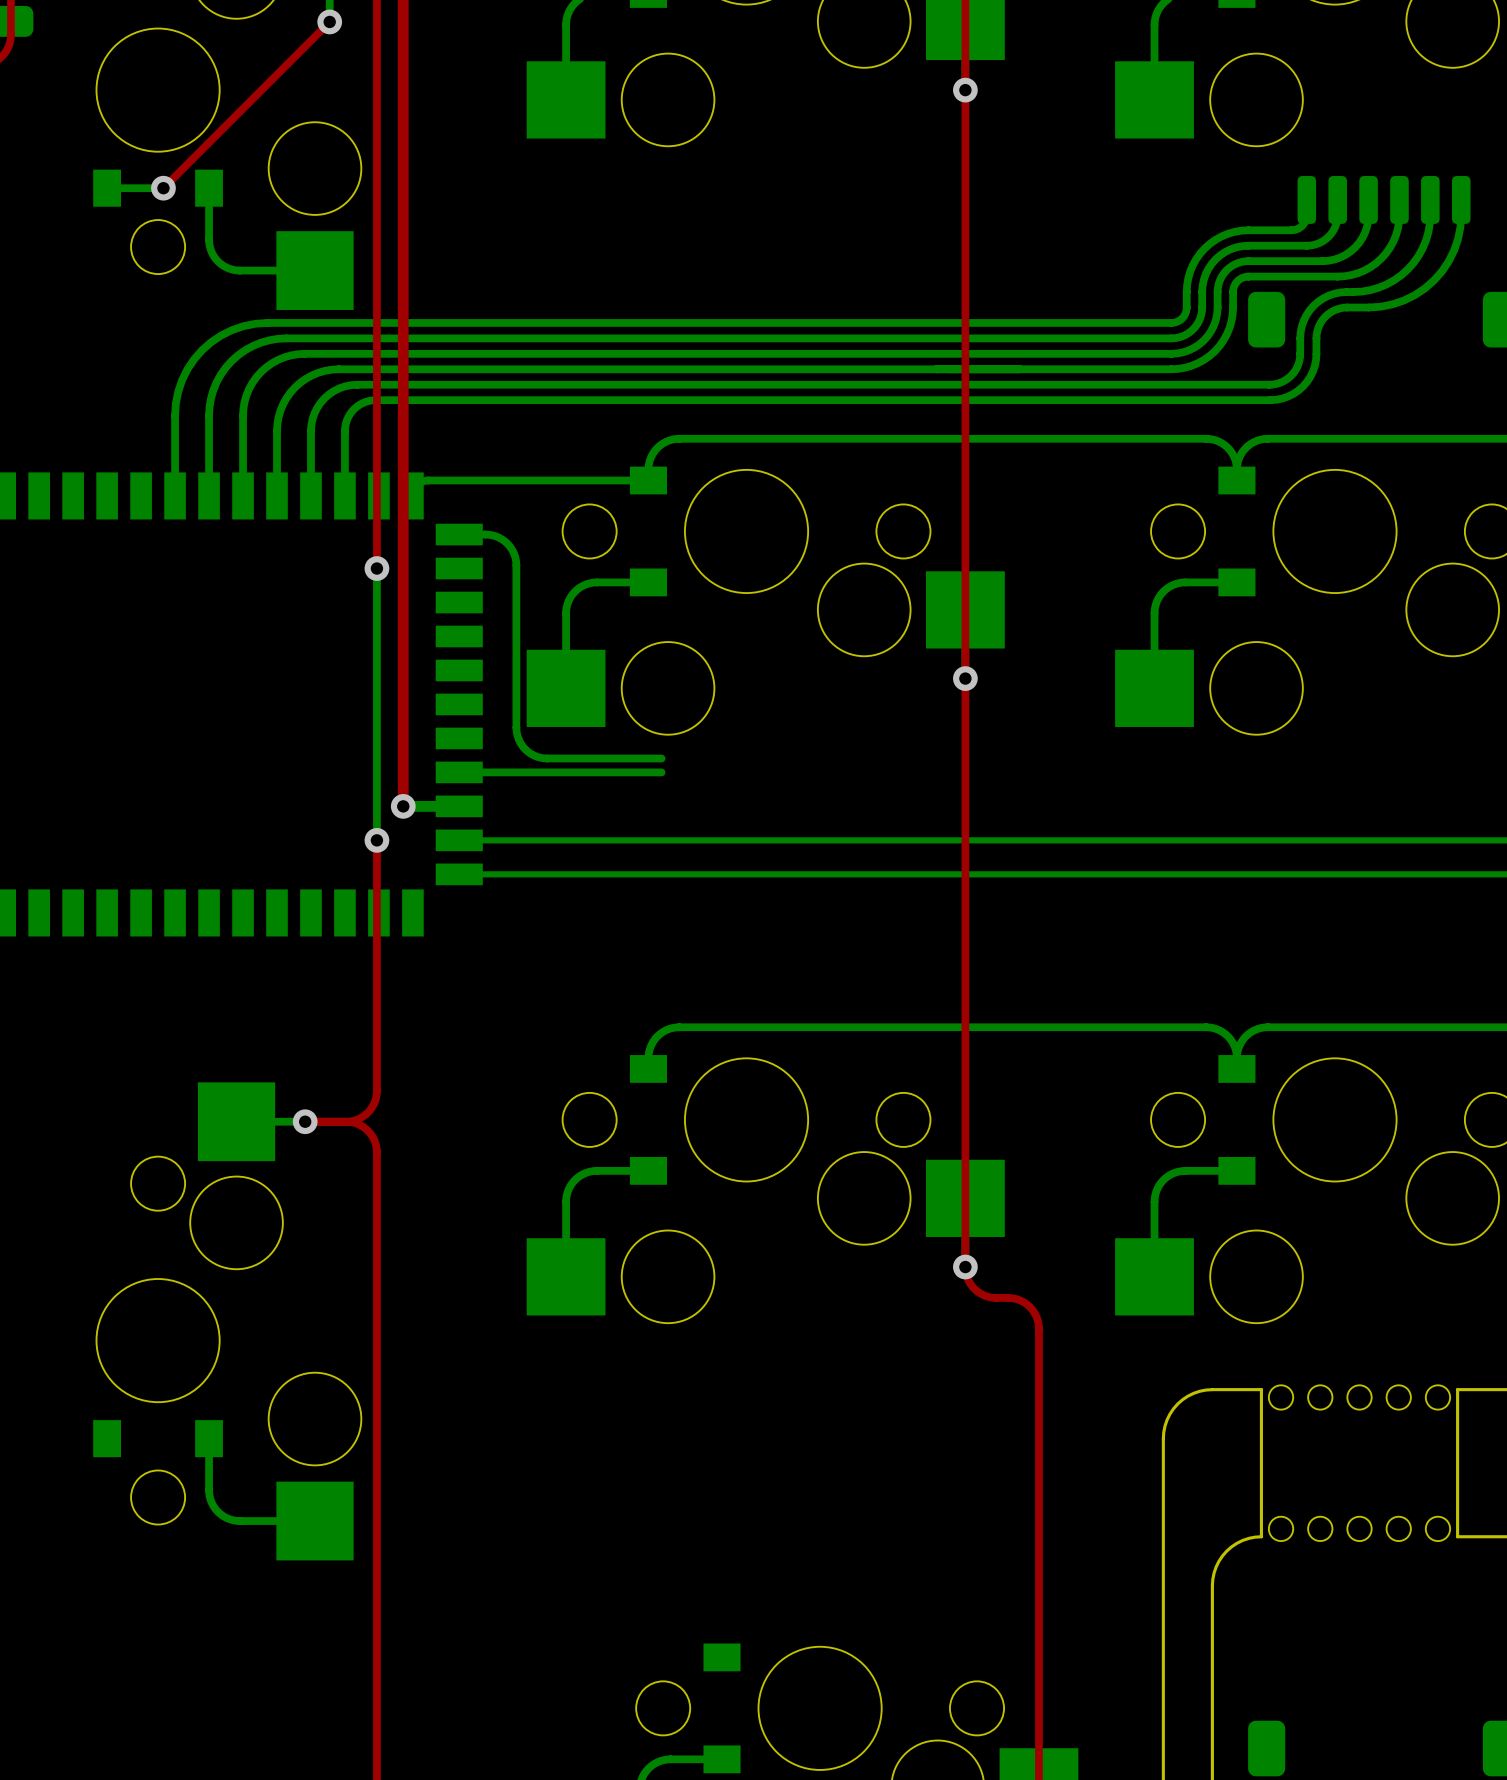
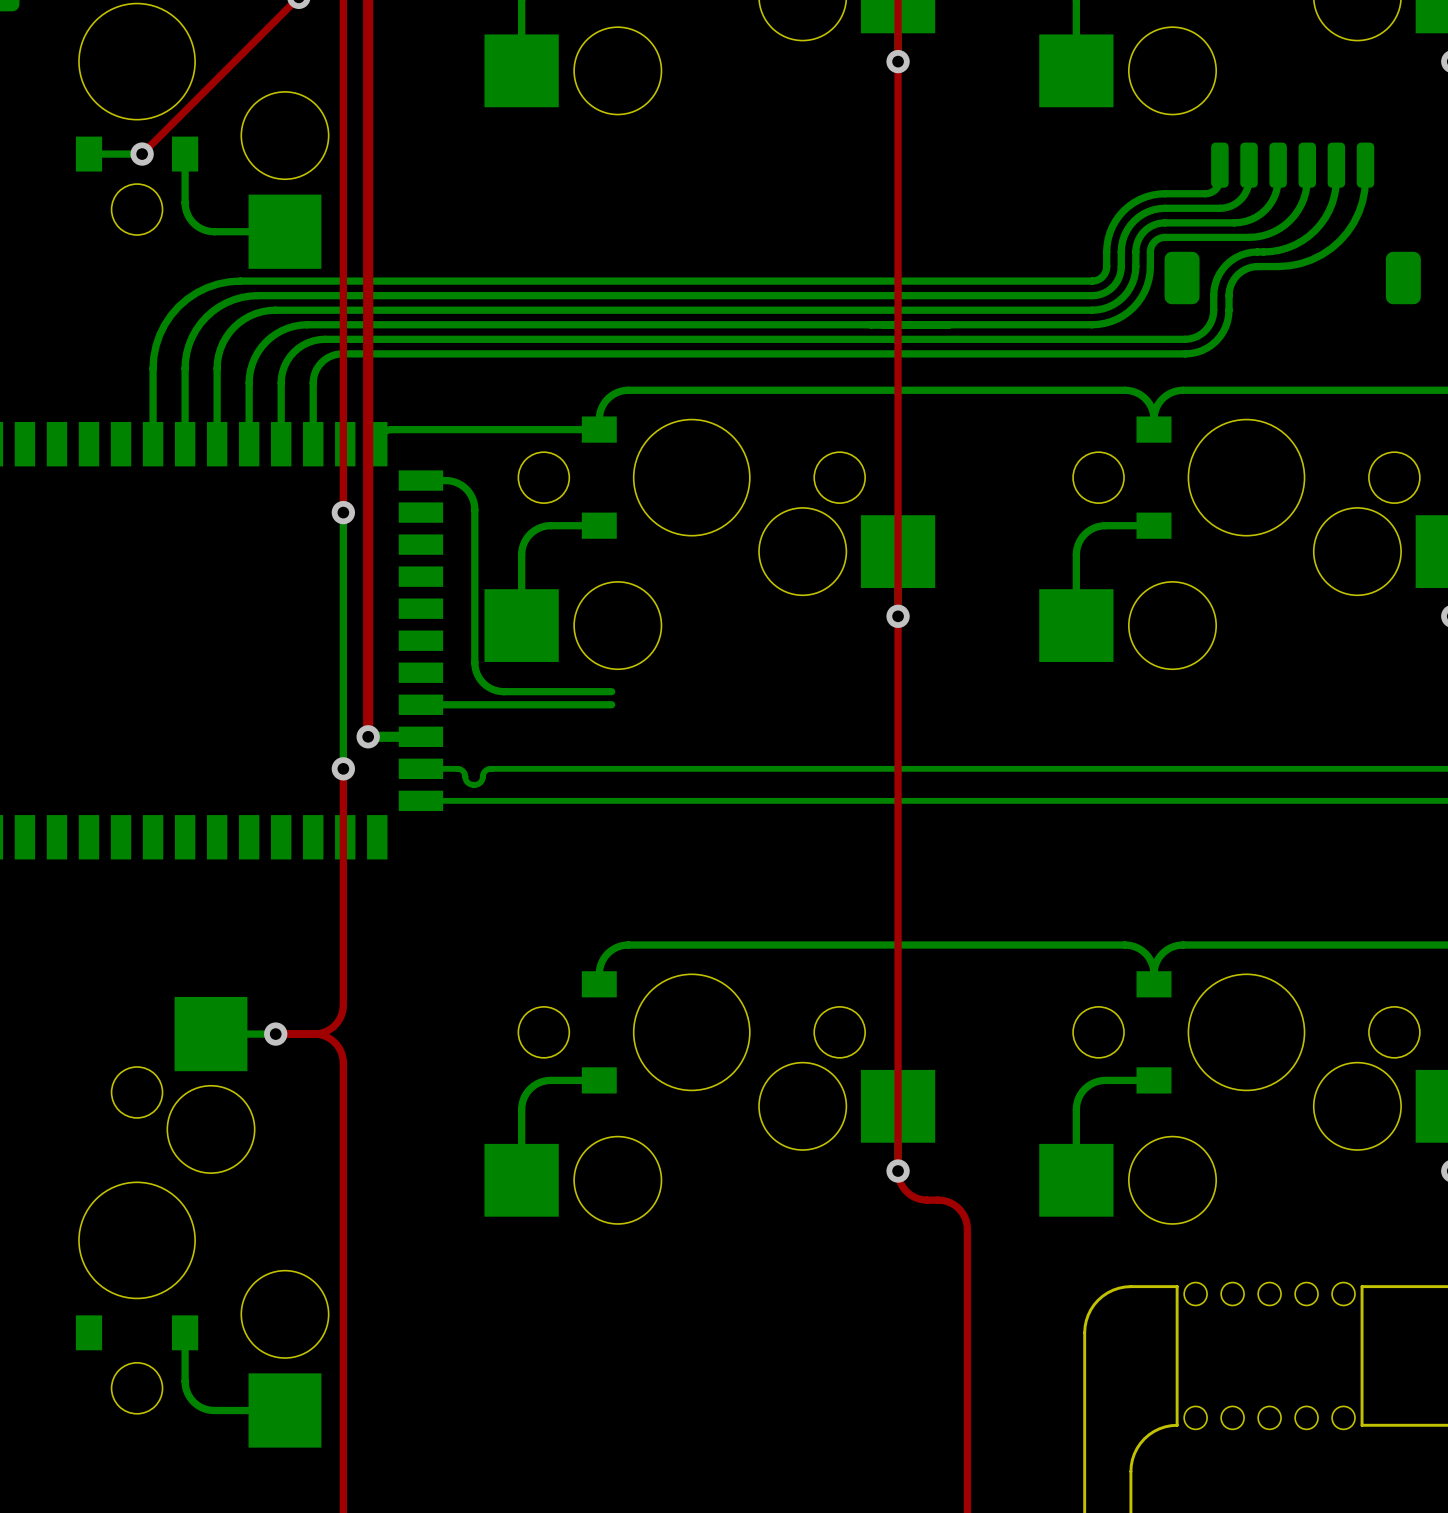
bottom track: (497, 840) (533, 840) -> (457, 768) (463, 771) (466, 781) (473, 784) (480, 782) (484, 771) (490, 768)

